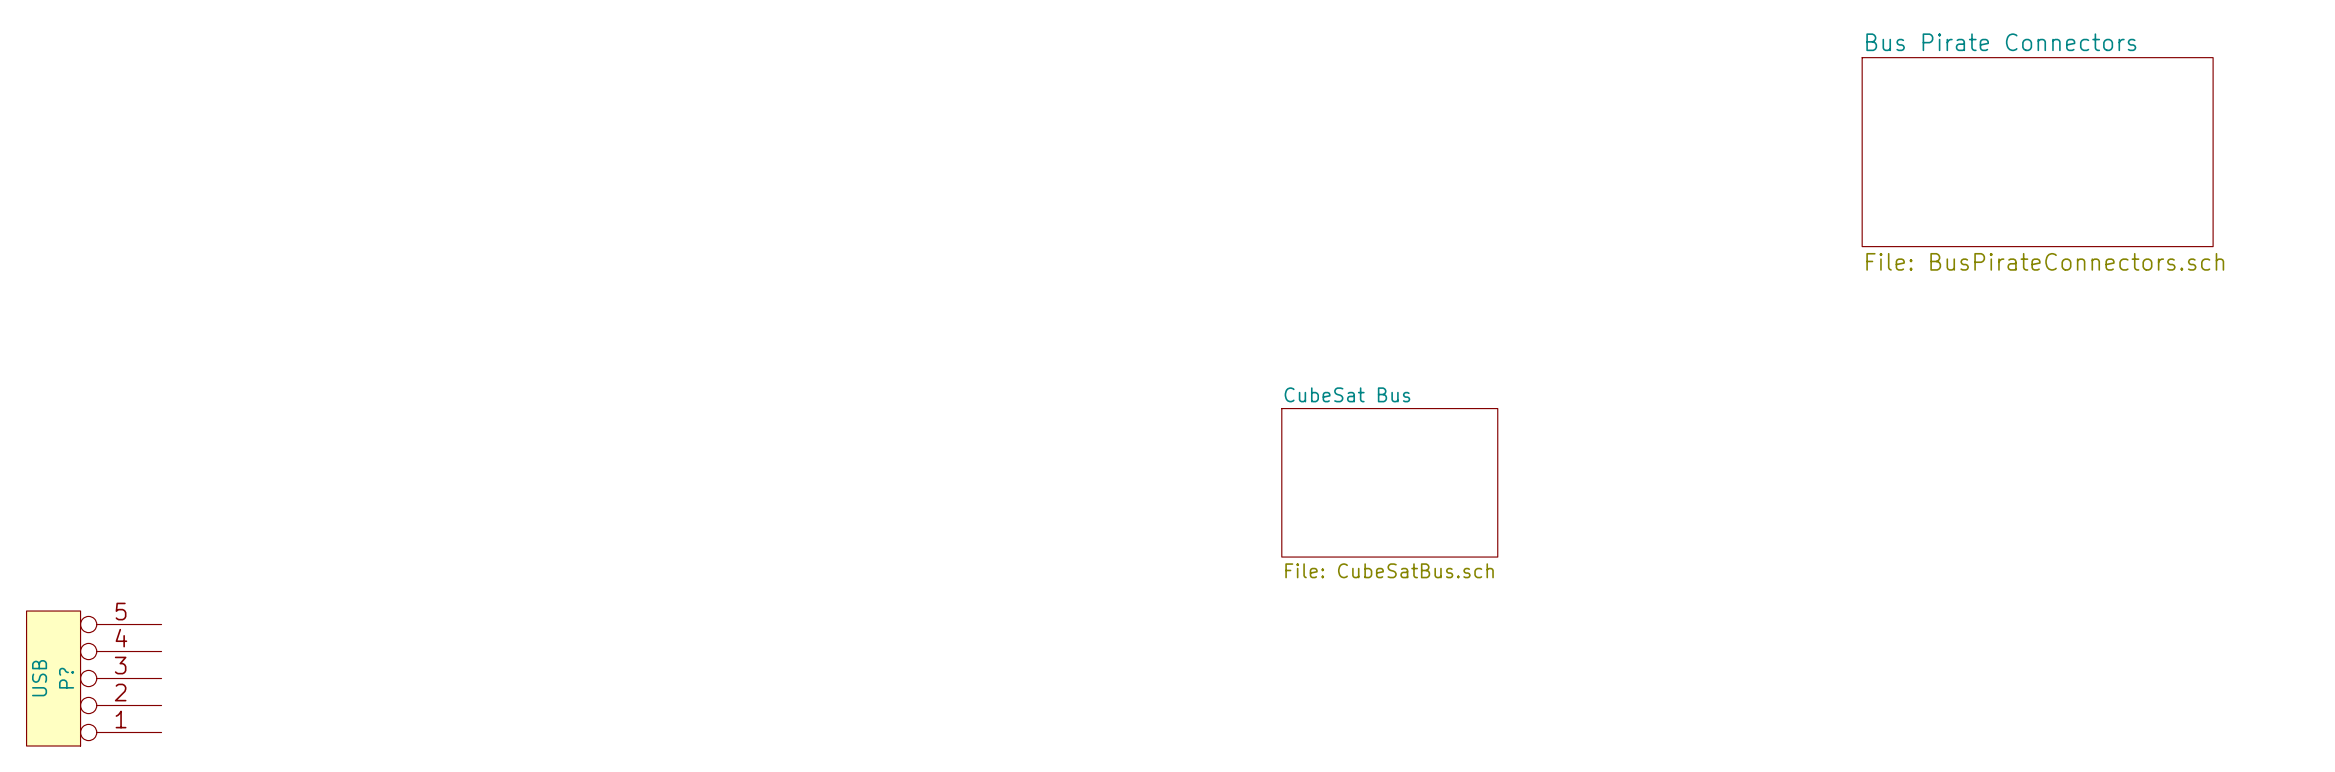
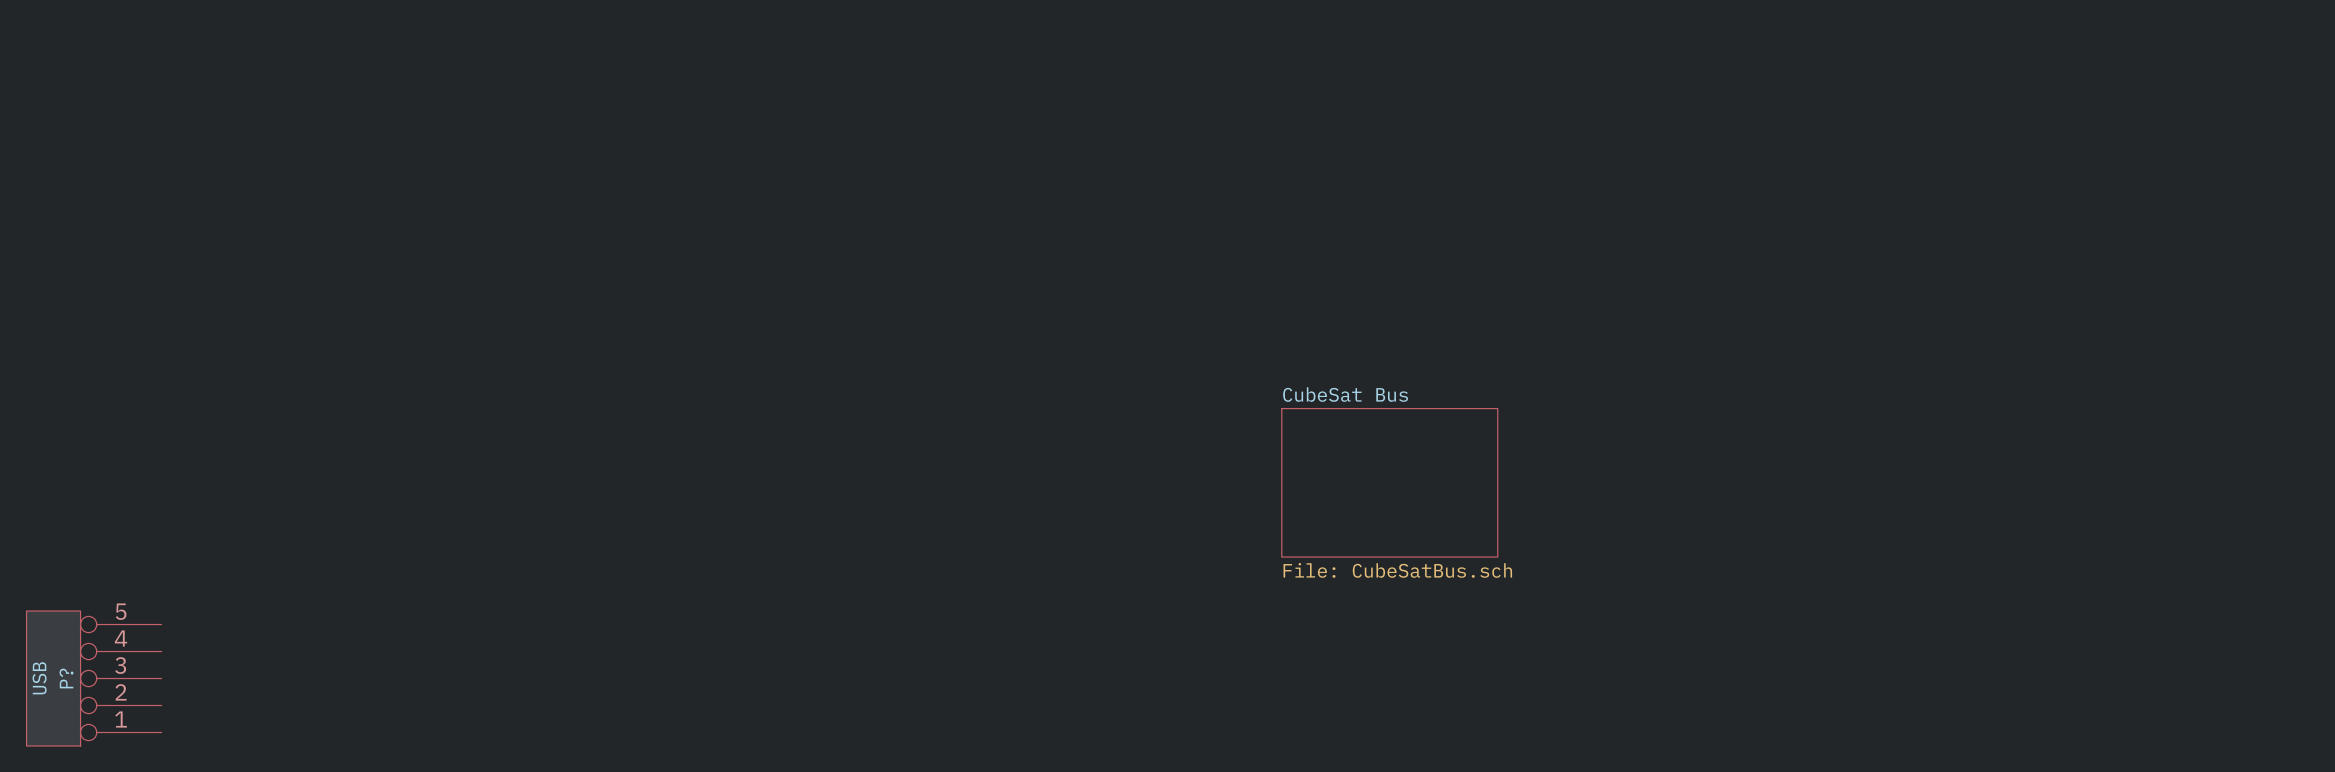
sheet Bus Pirate Connectors: File: BusPirateConnectors.sch (2037, 152) -> none

